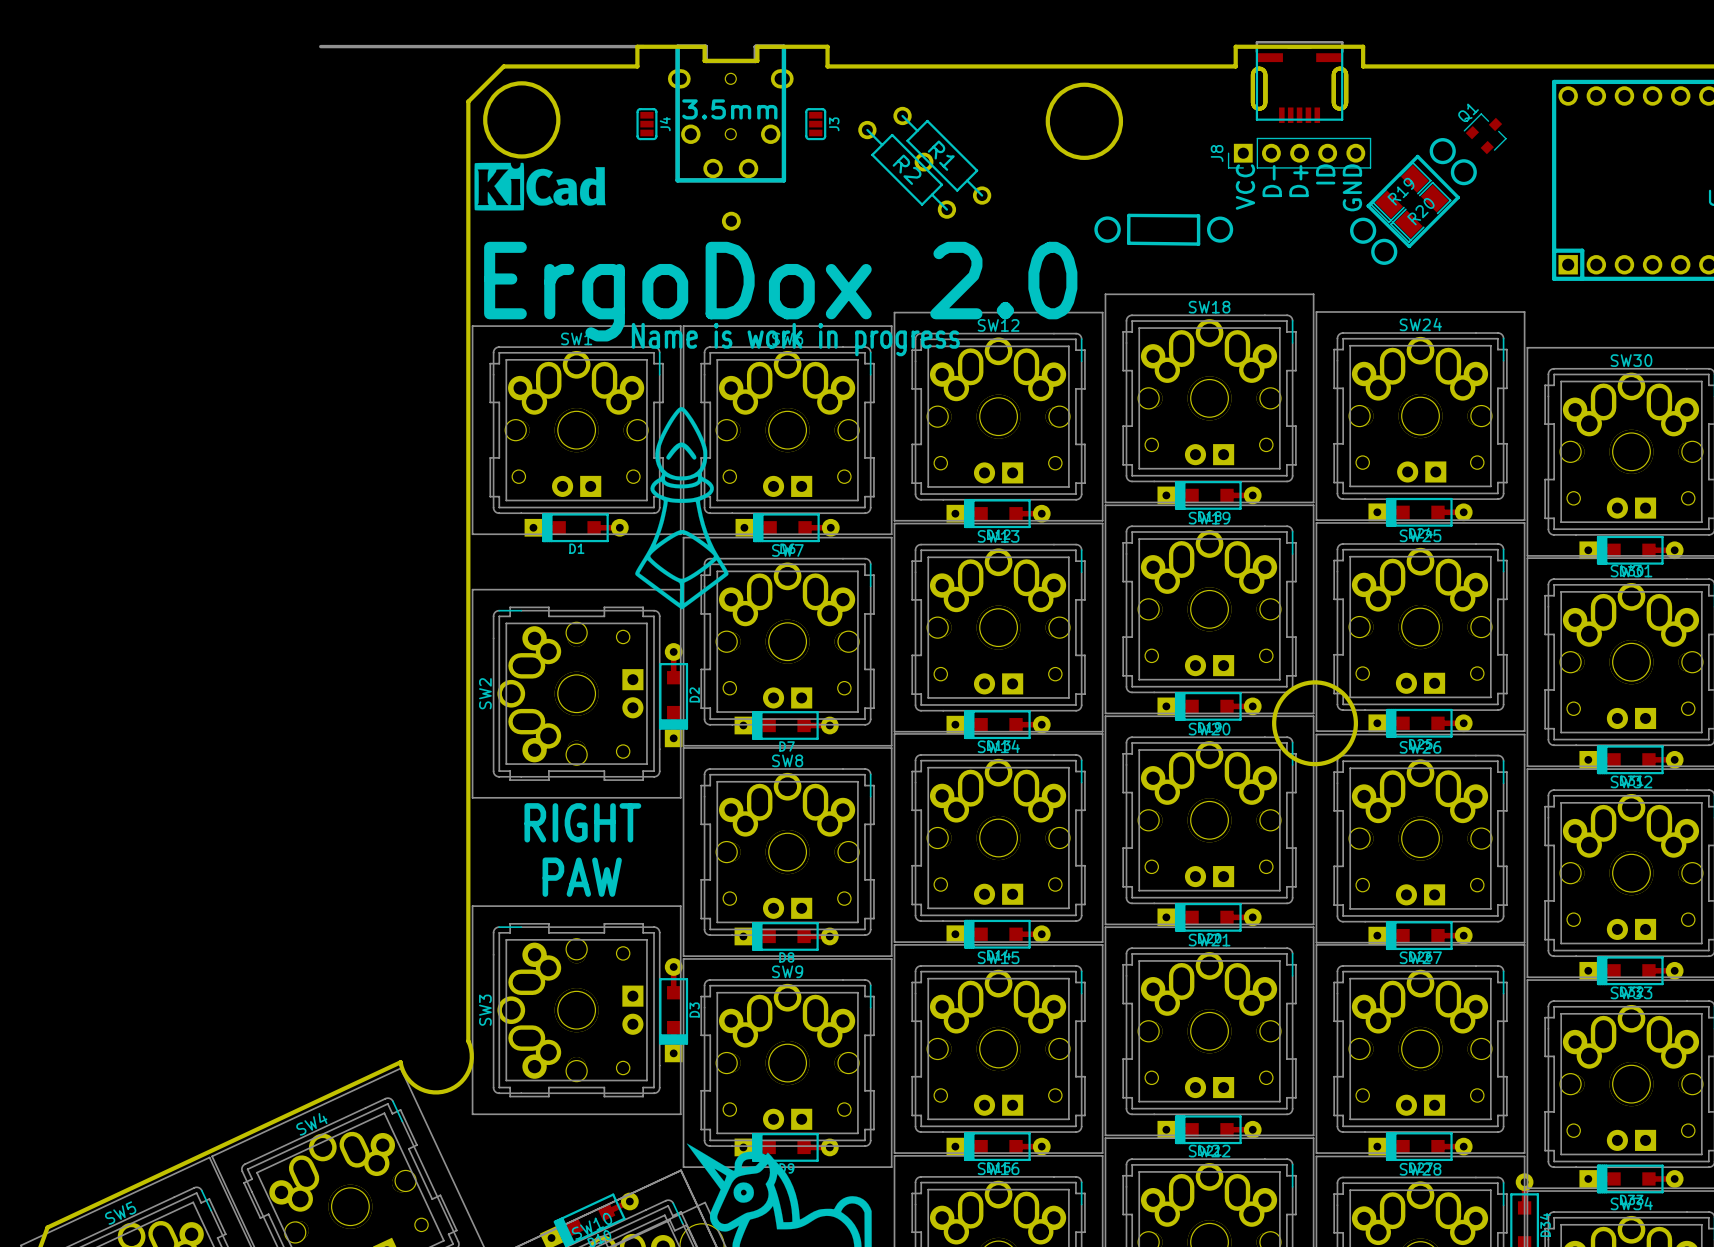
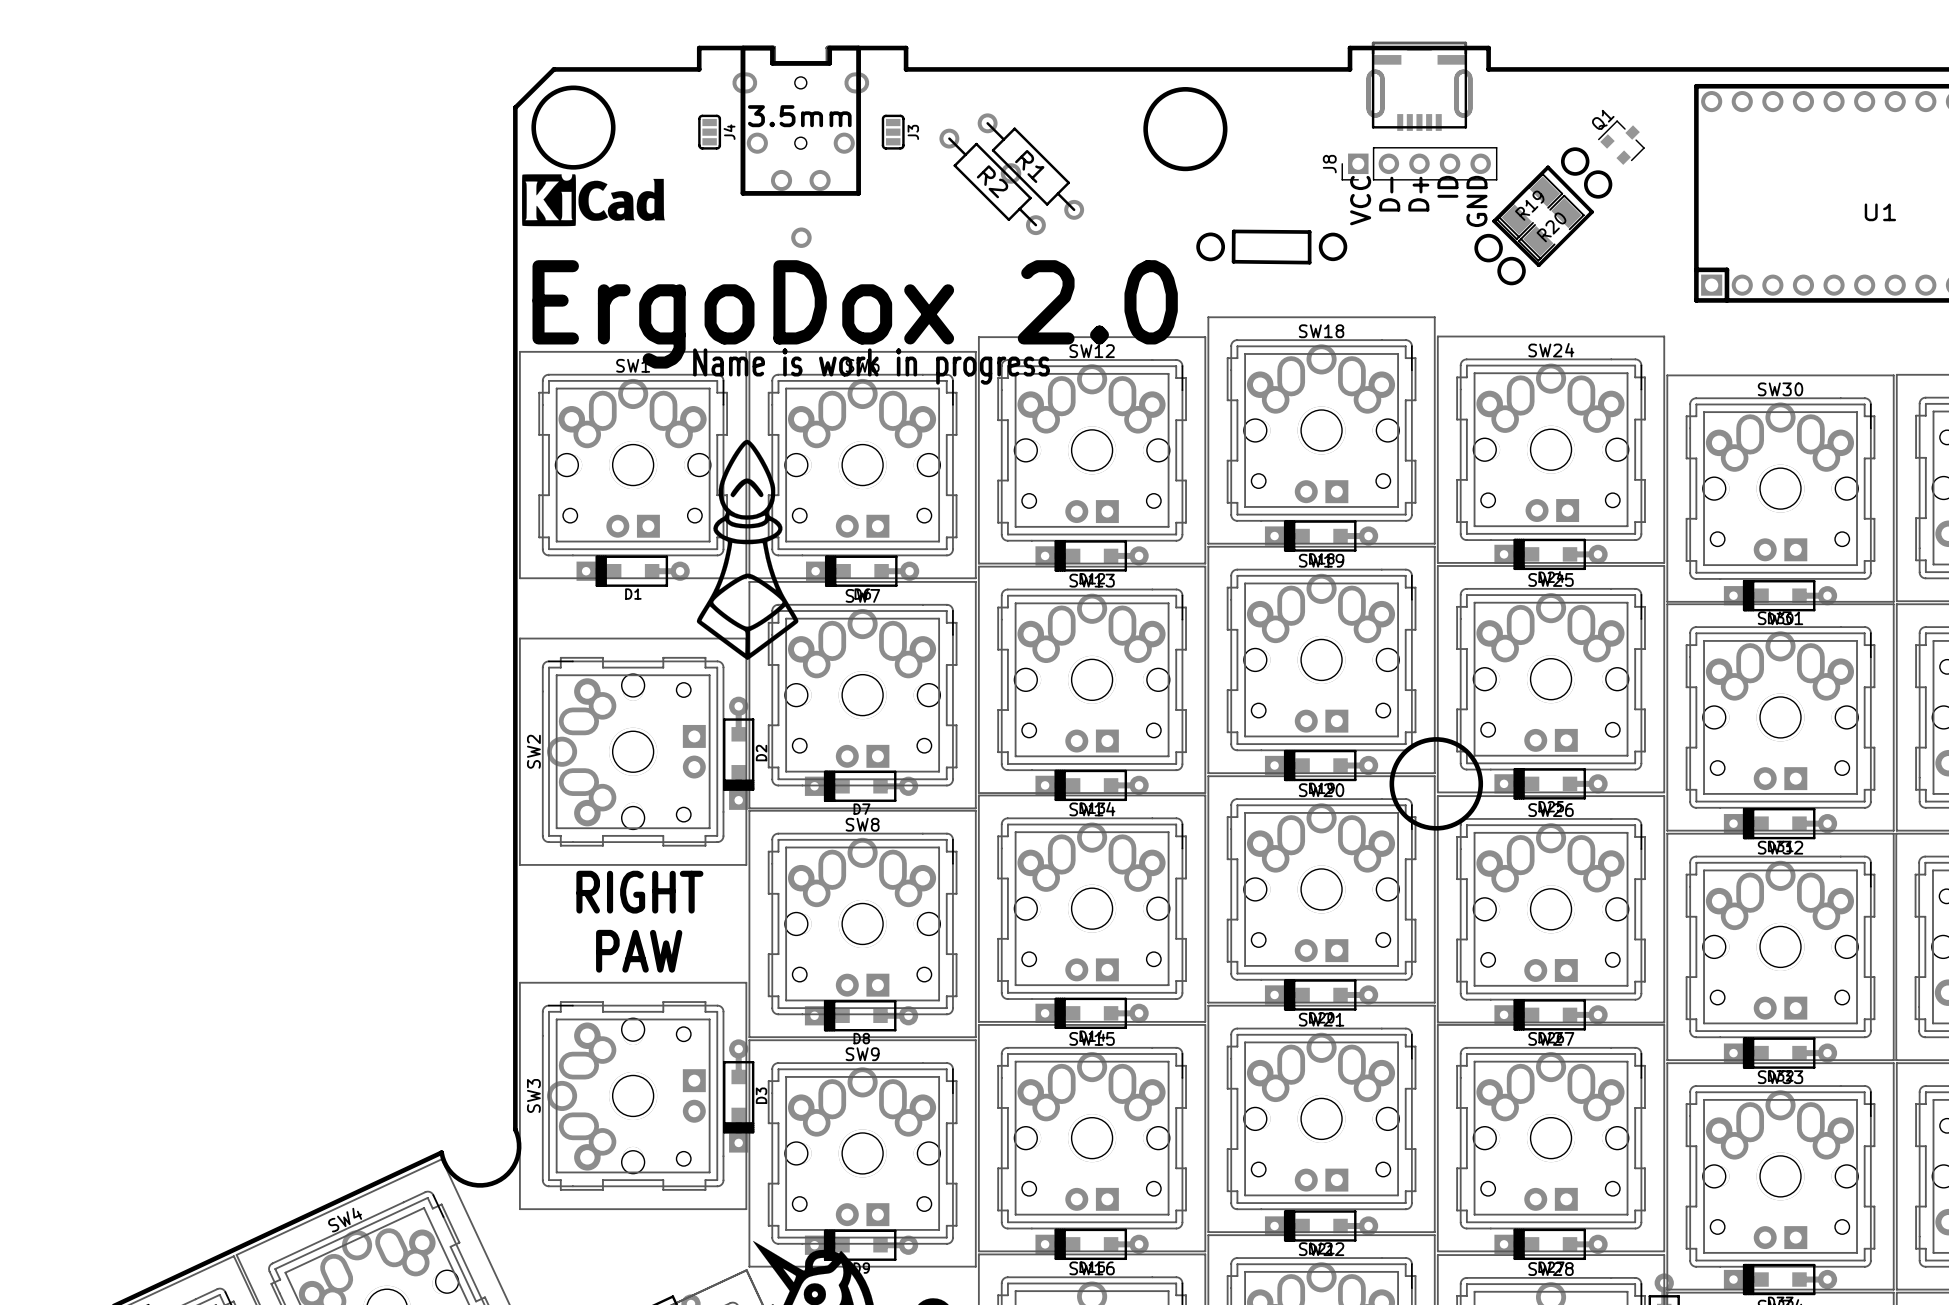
line: (320, 46) (643, 46) -> none

